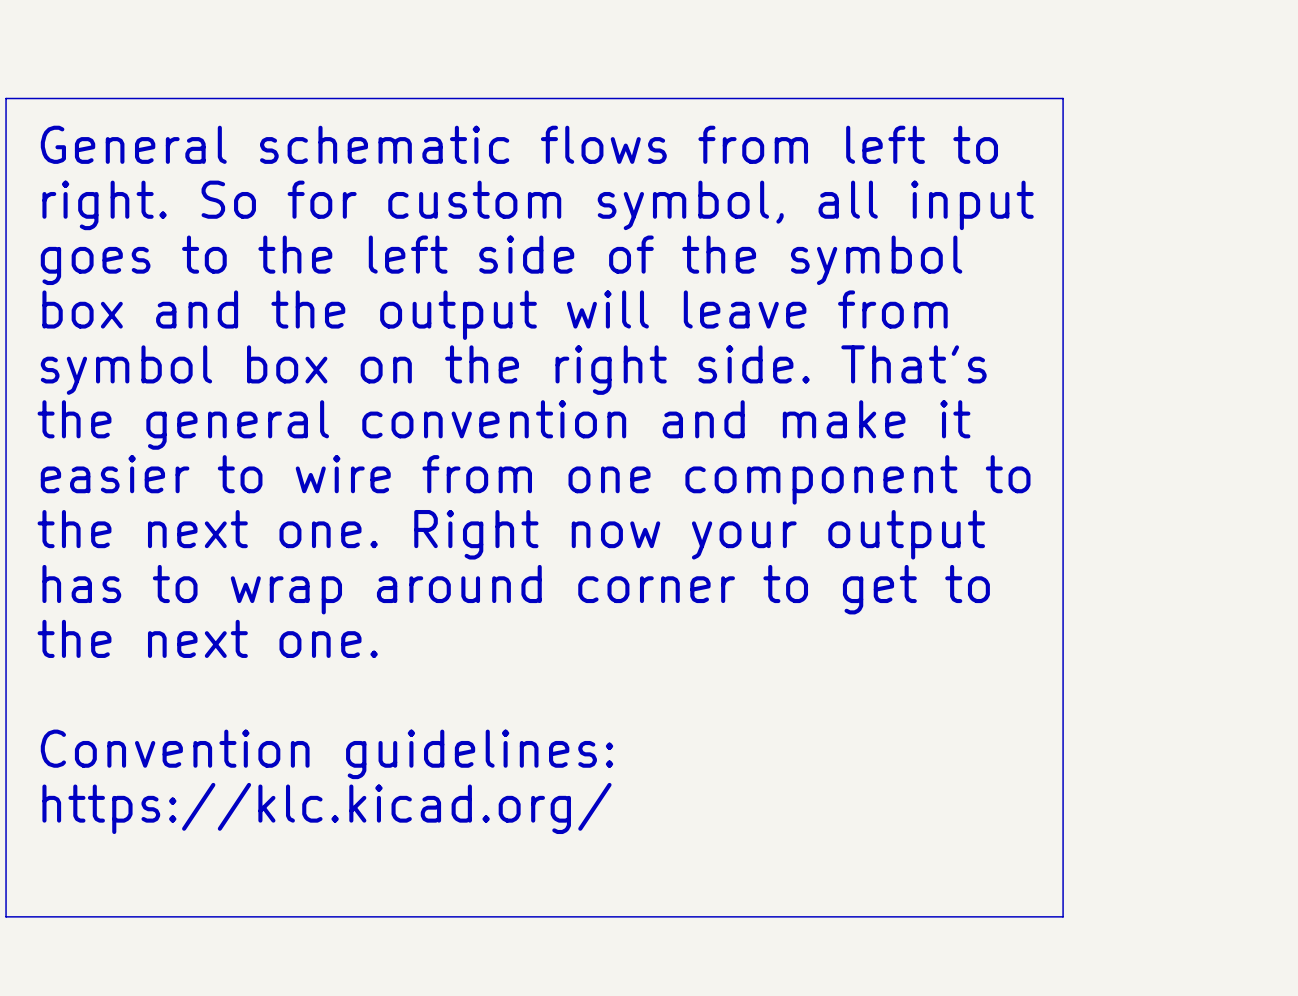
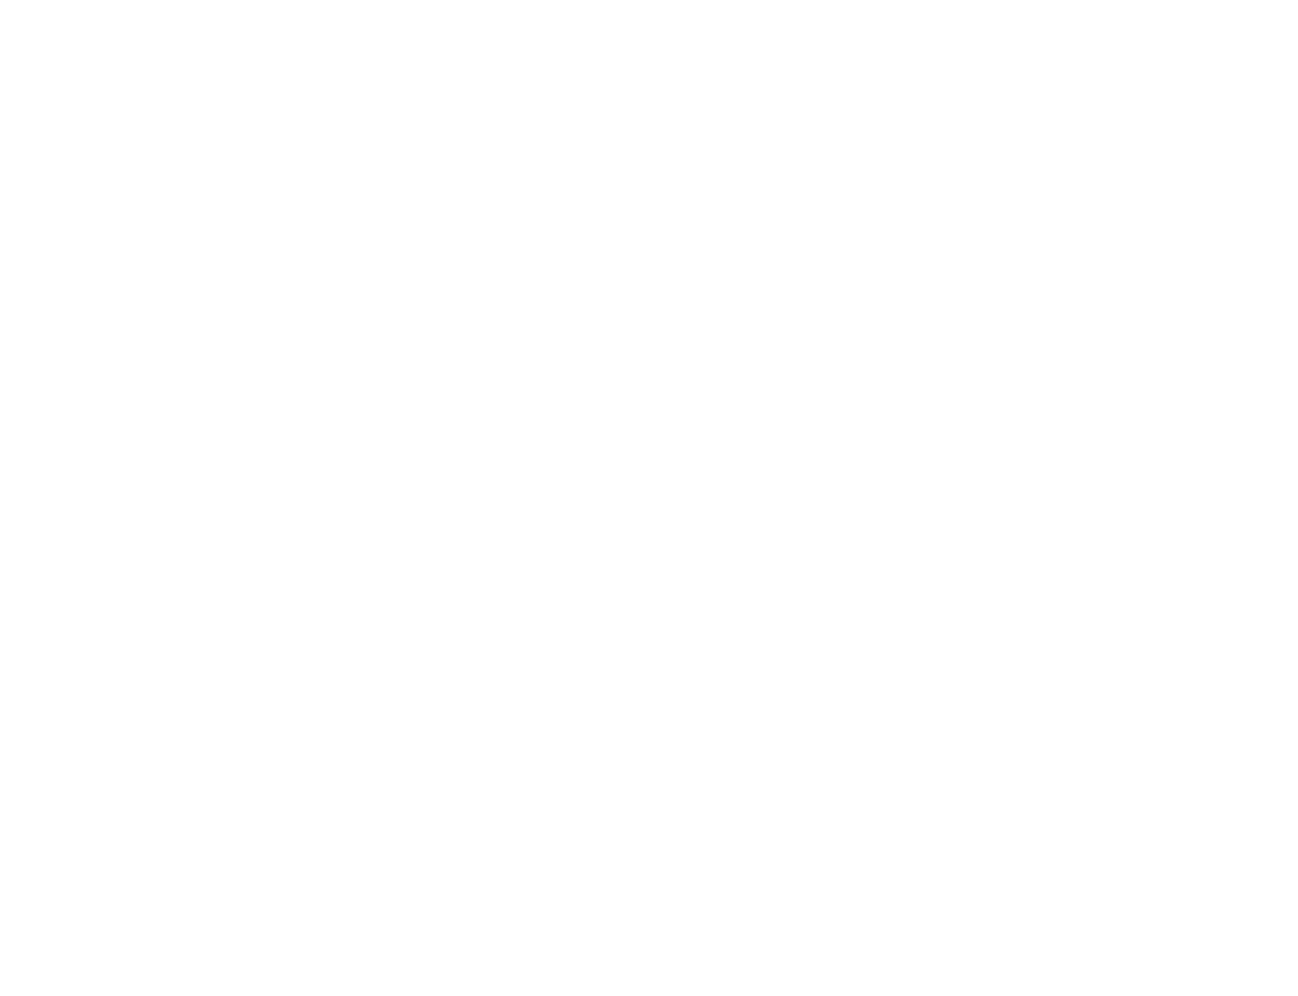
line: (6, 98) (1063, 98) (1063, 916) (6, 916) (6, 98) -> none
text: General schematic flows from left to (519, 144) -> none
text: right. So for custom symbol, all input (538, 205) -> none
text: goes to the left side of the symbol (501, 260) -> none
text: box and the output will leave from (495, 315) -> none
text: symbol box on the right side. That's (513, 370) -> none
text: the general convention and make it (503, 424) -> none
text: easier to wire from one component to (535, 479) -> none
text: the next one. Right now your output (511, 534) -> none
text: has to wrap around corner to get to (516, 589) -> none
text: the next one. (207, 638) -> none
text: Convention guidelines: (326, 754) -> none
text: https://klc.kicad.org/ (326, 808) -> none

